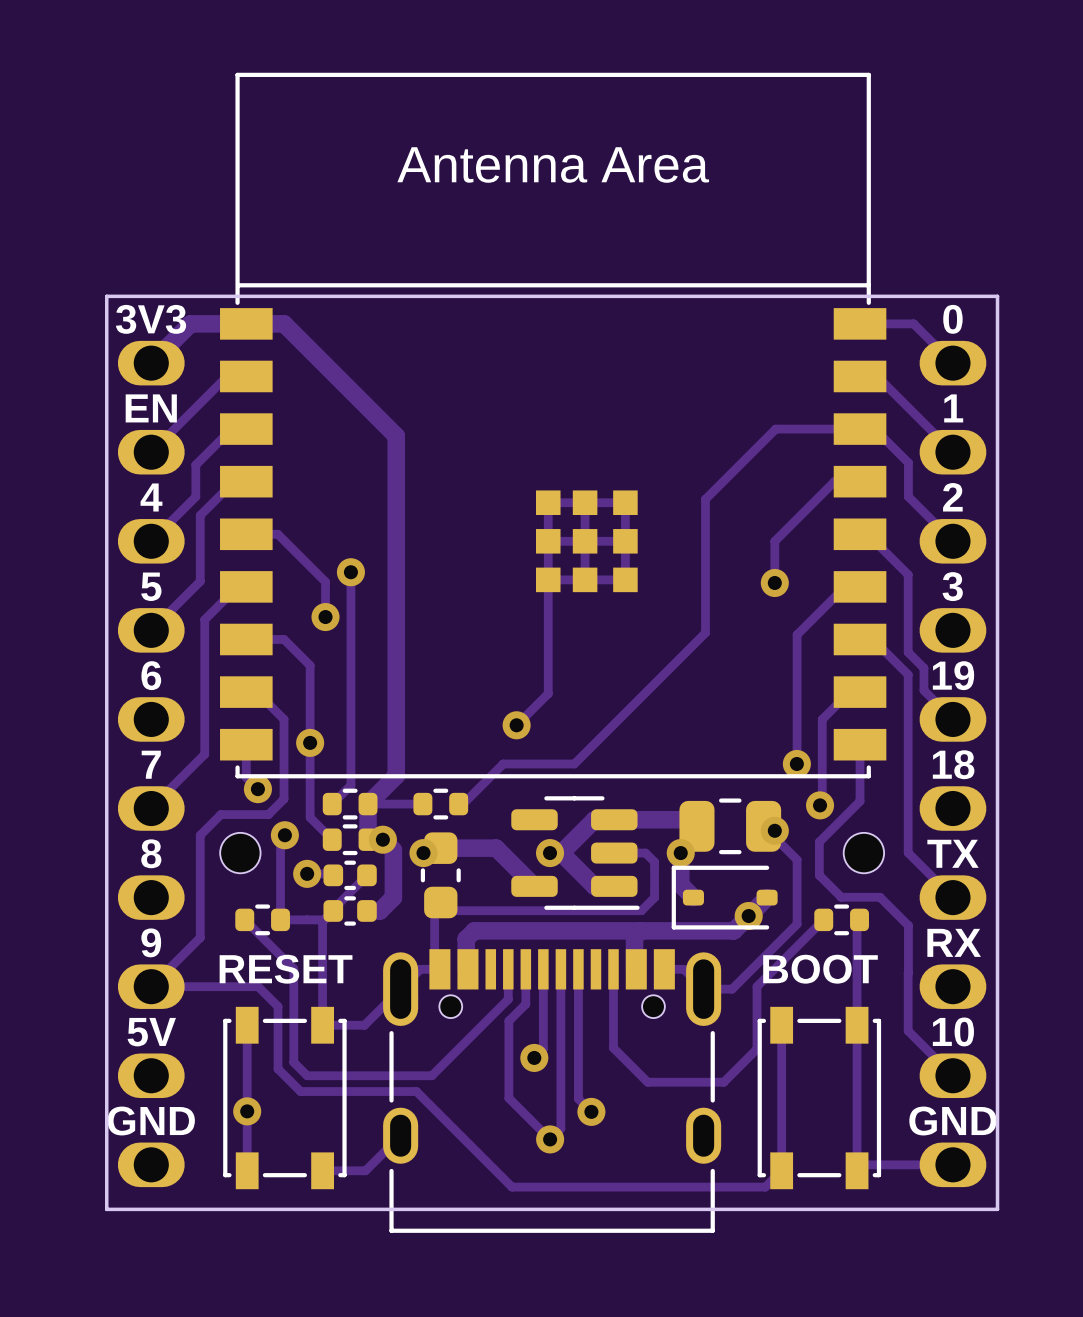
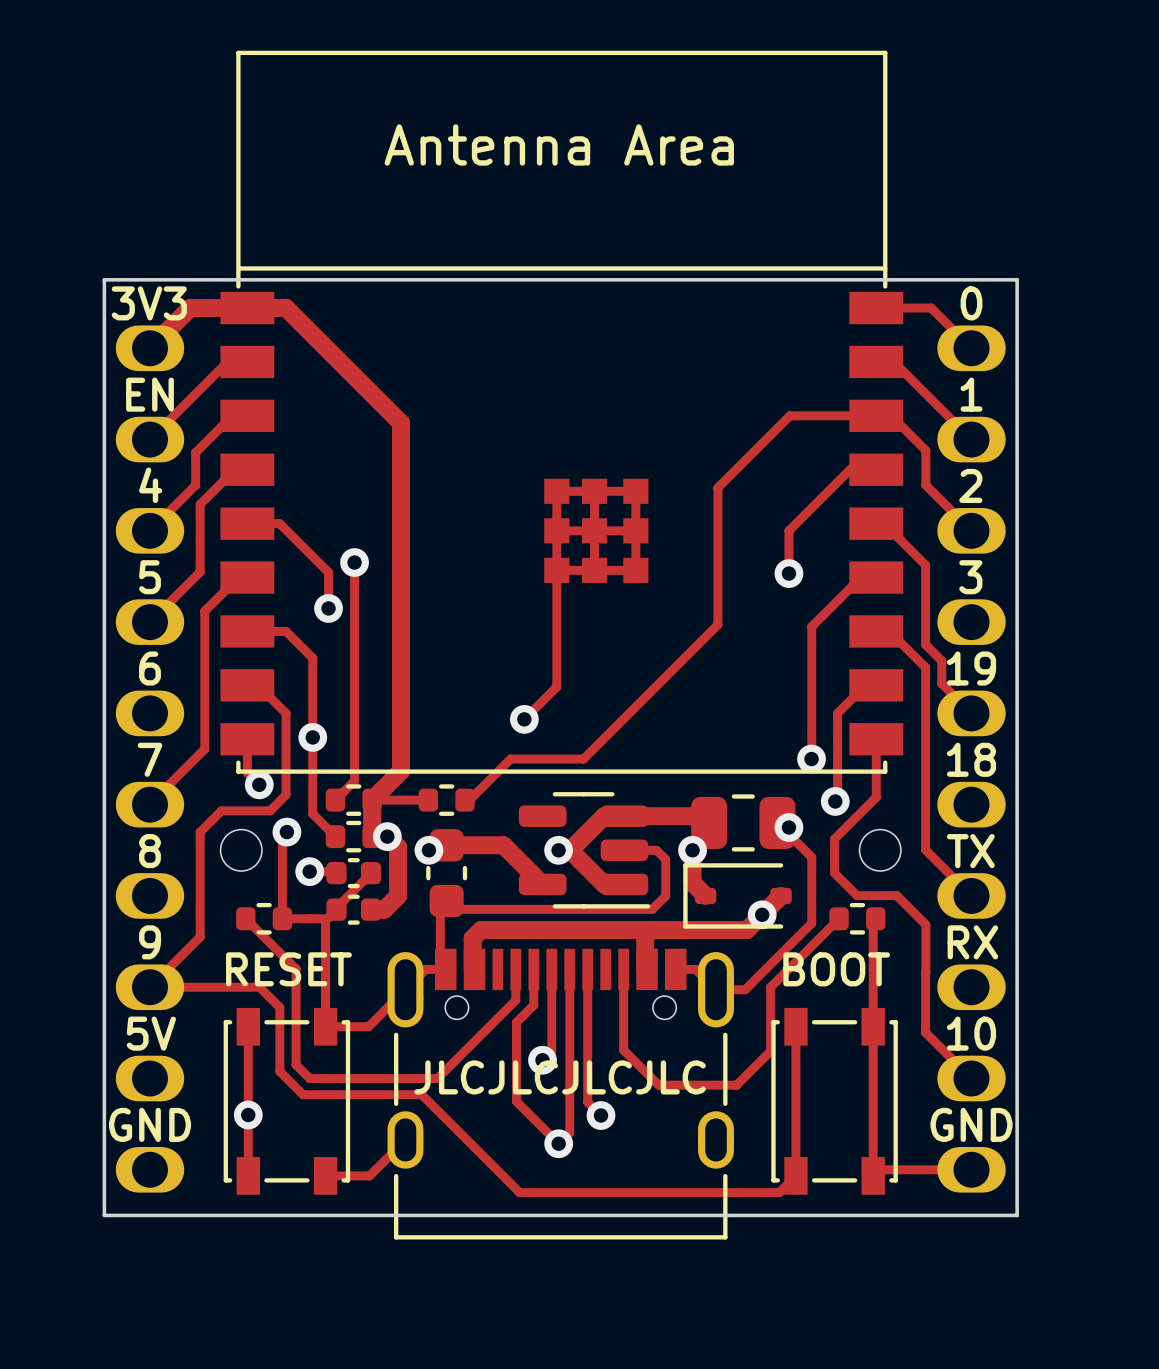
text: none -> JLCJLCJLCJLC (560, 1077)

